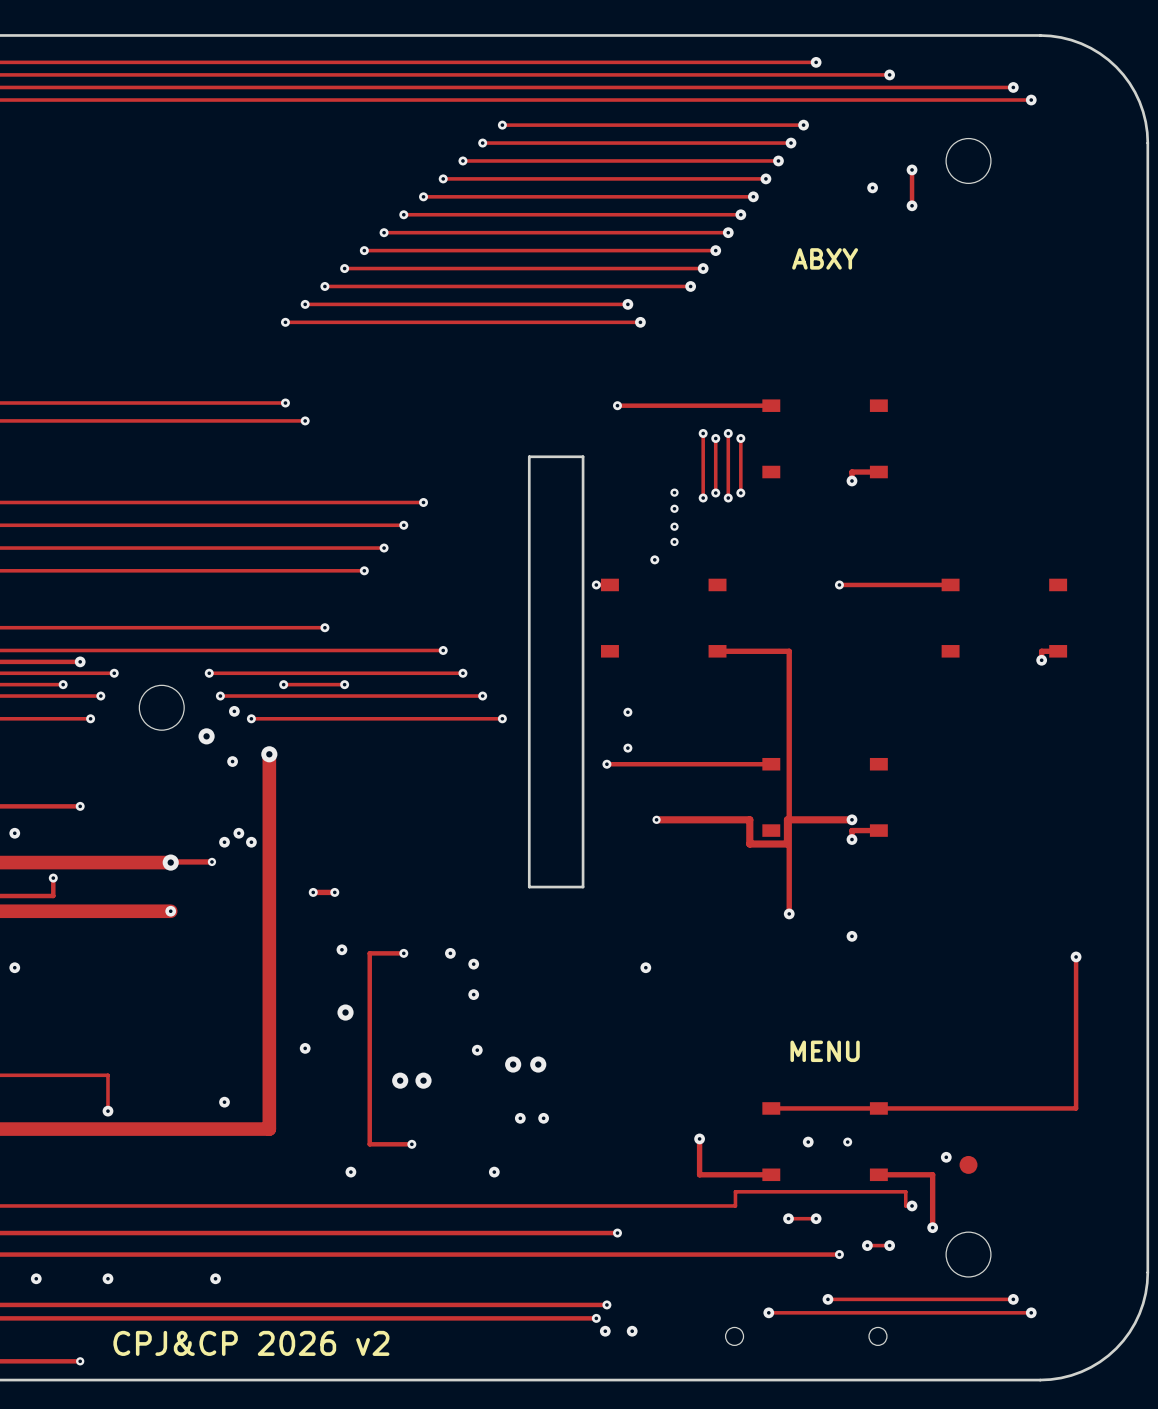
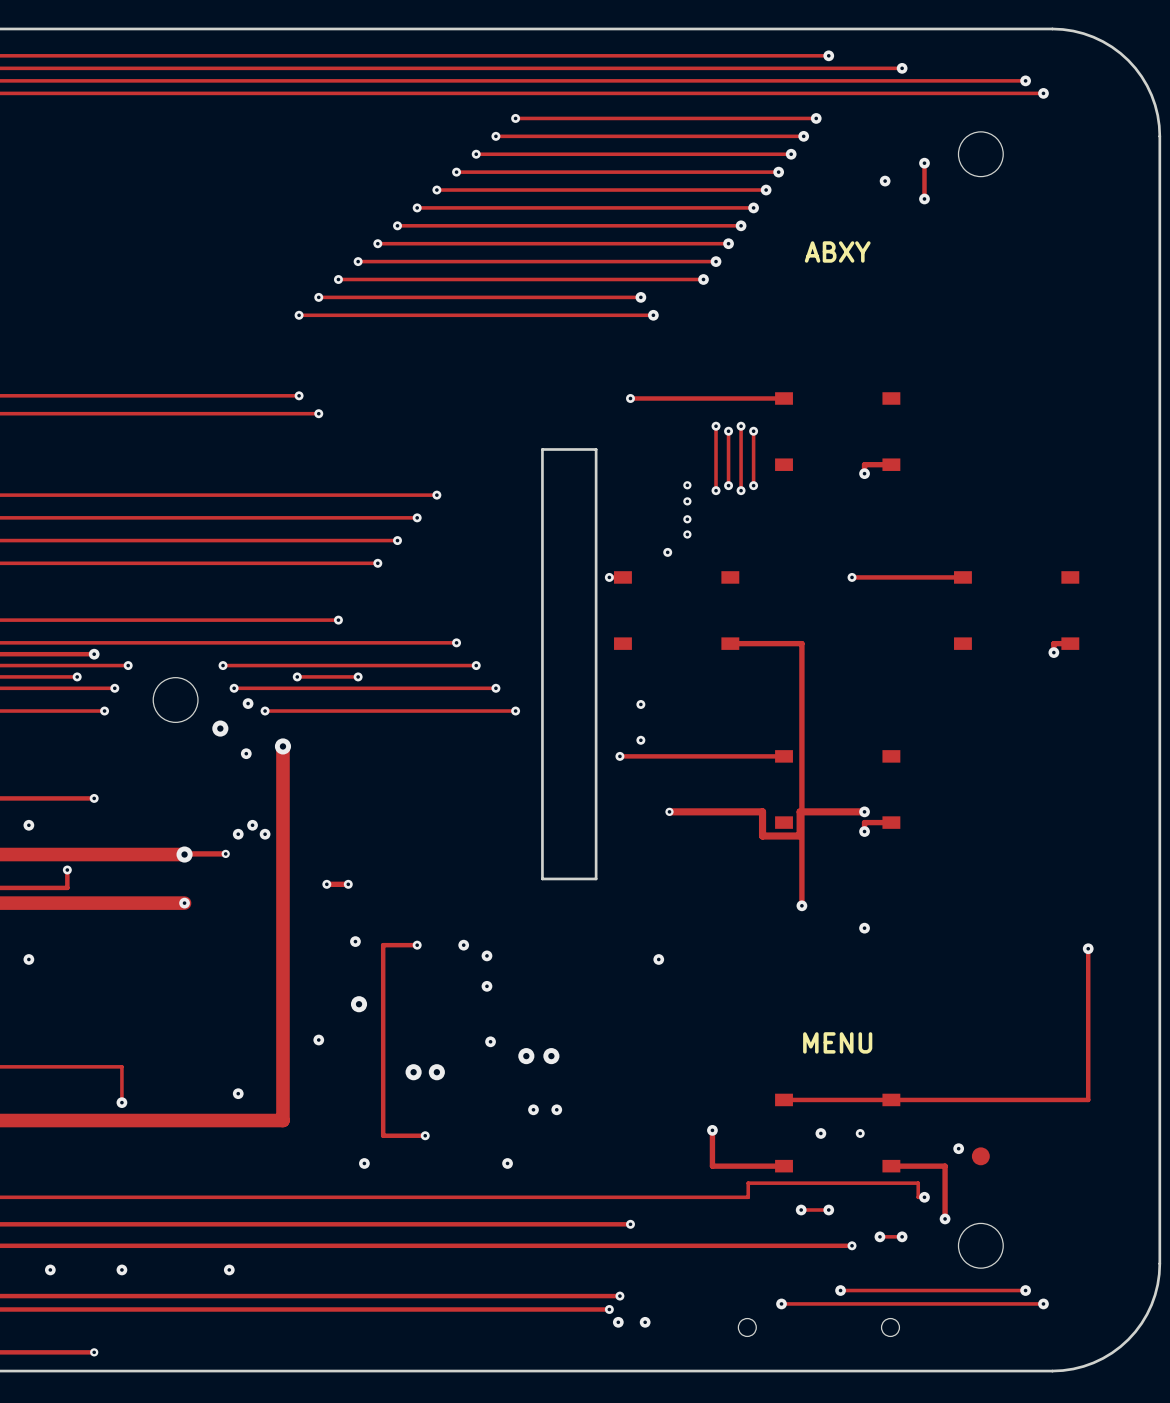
text: CPJ&CP 2026 v2 (251, 1343) -> none

